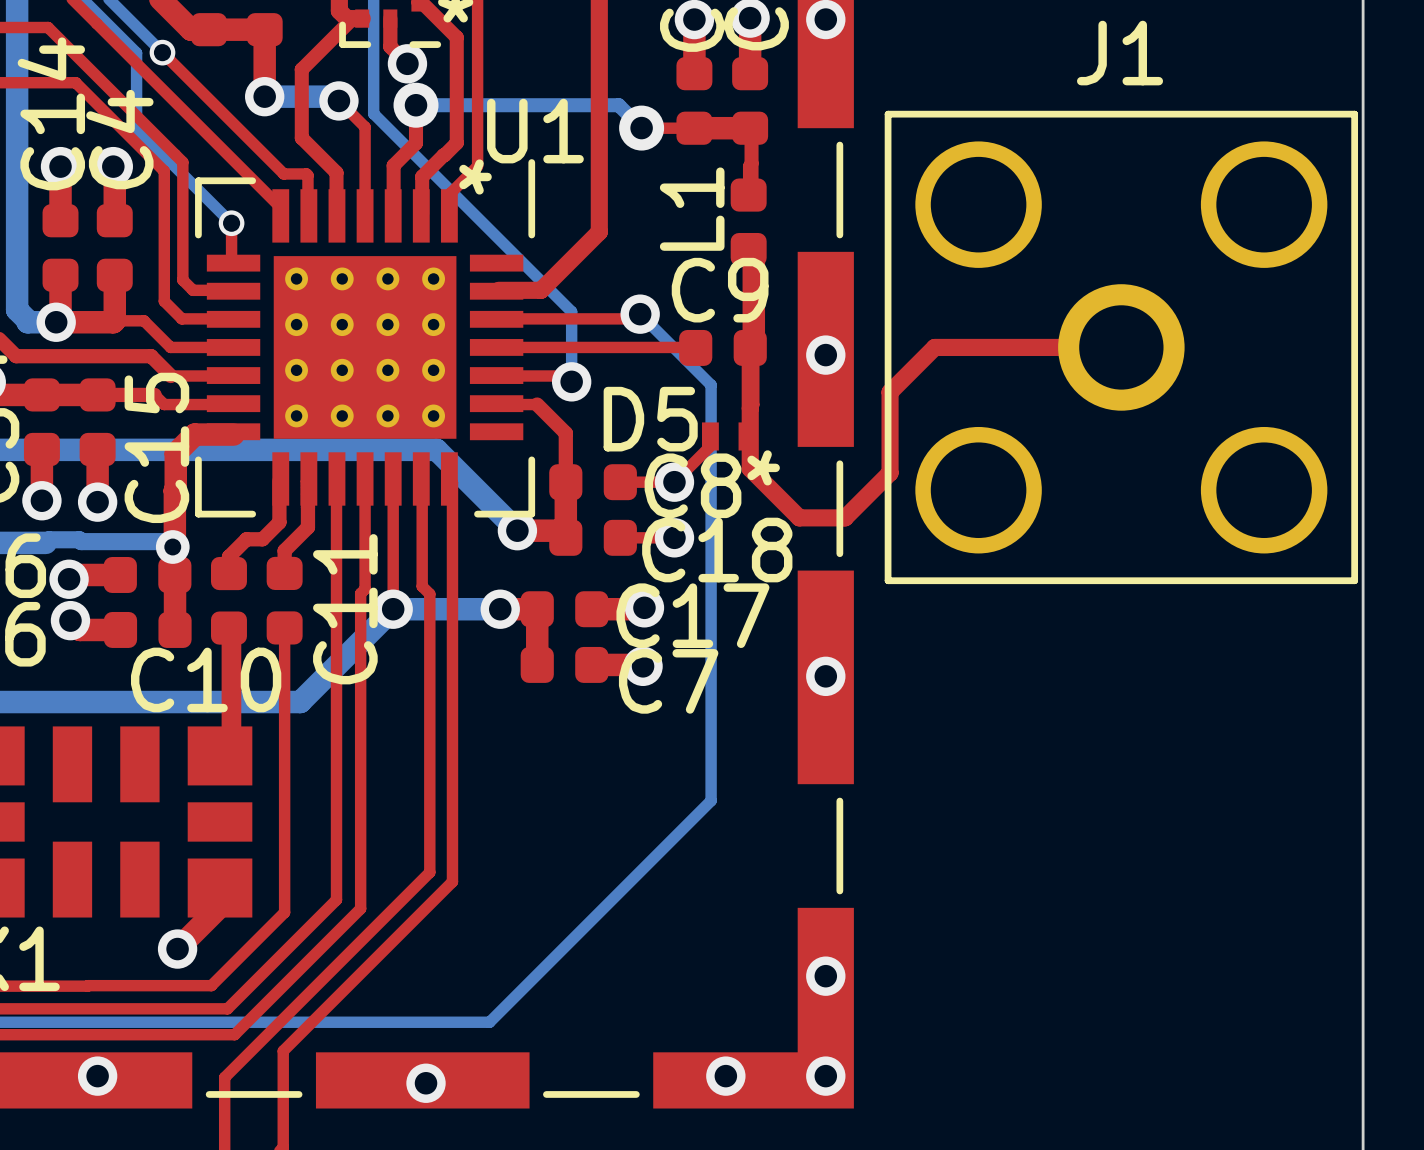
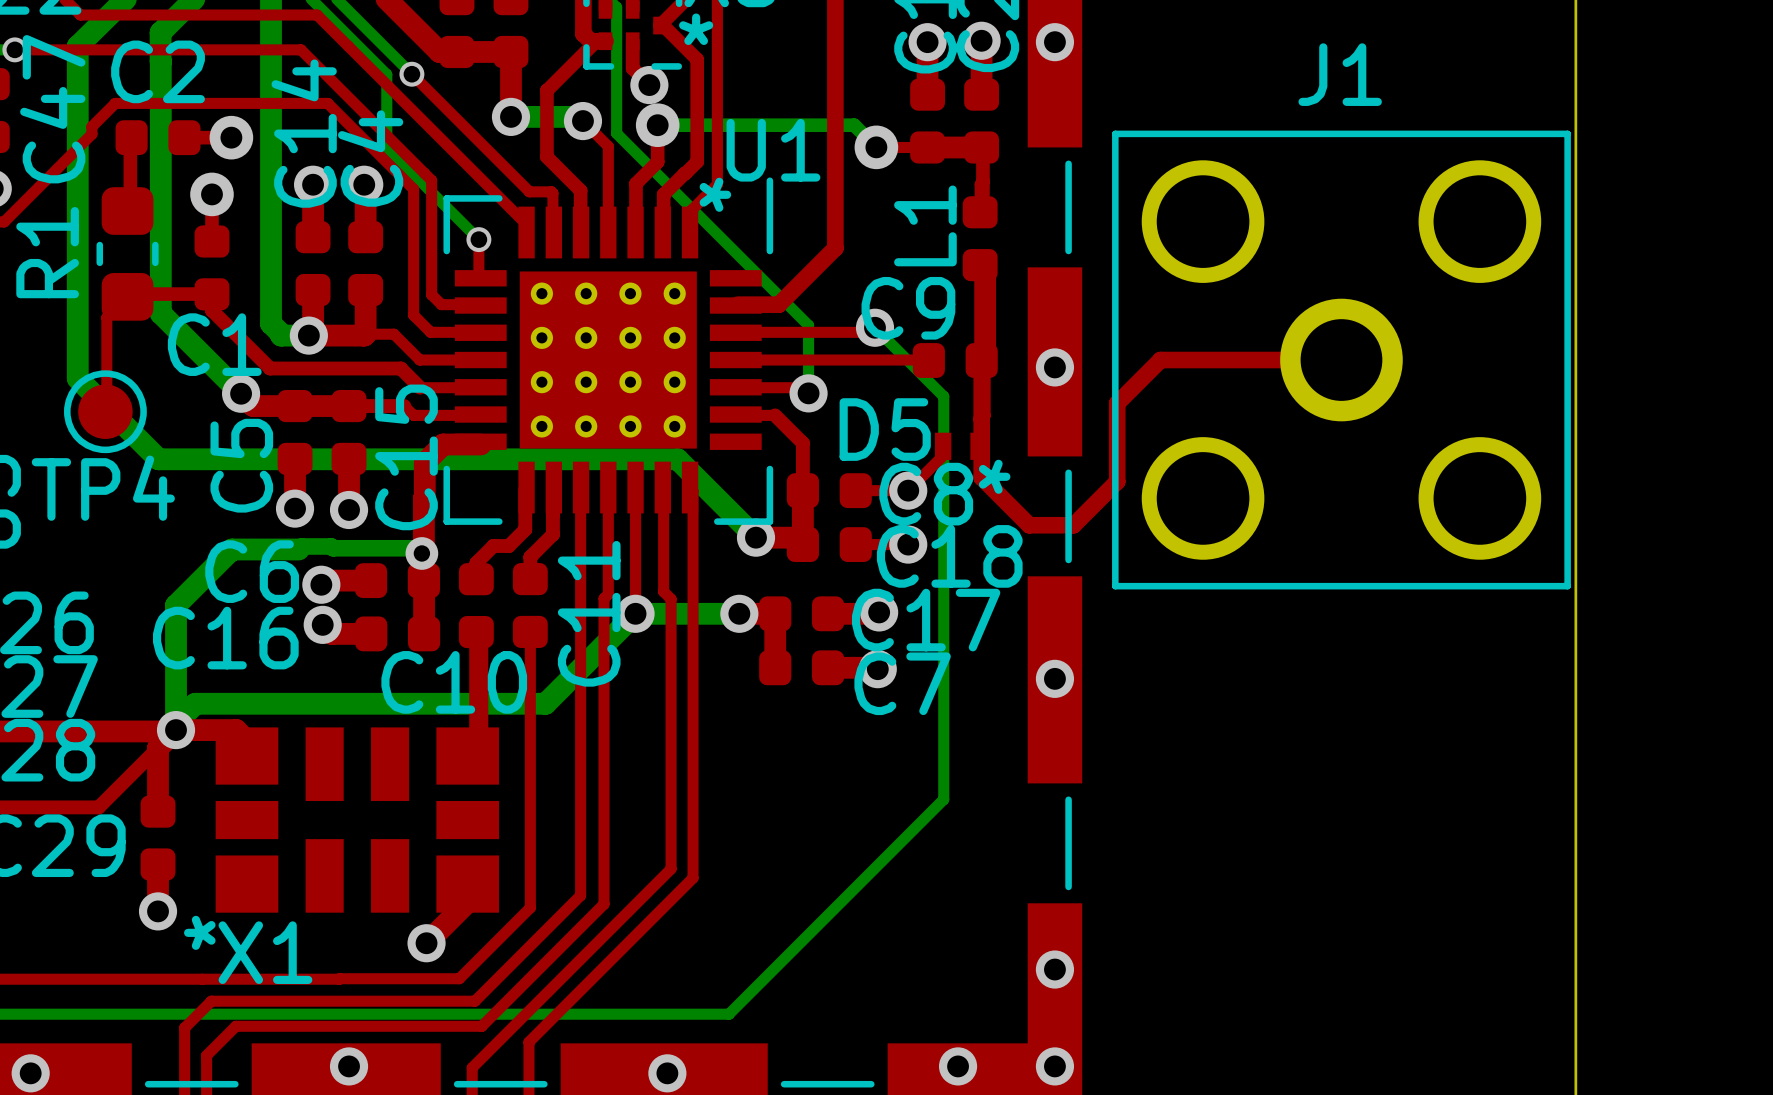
C9 name position: C9 (720, 290) -> C9 (908, 308)

